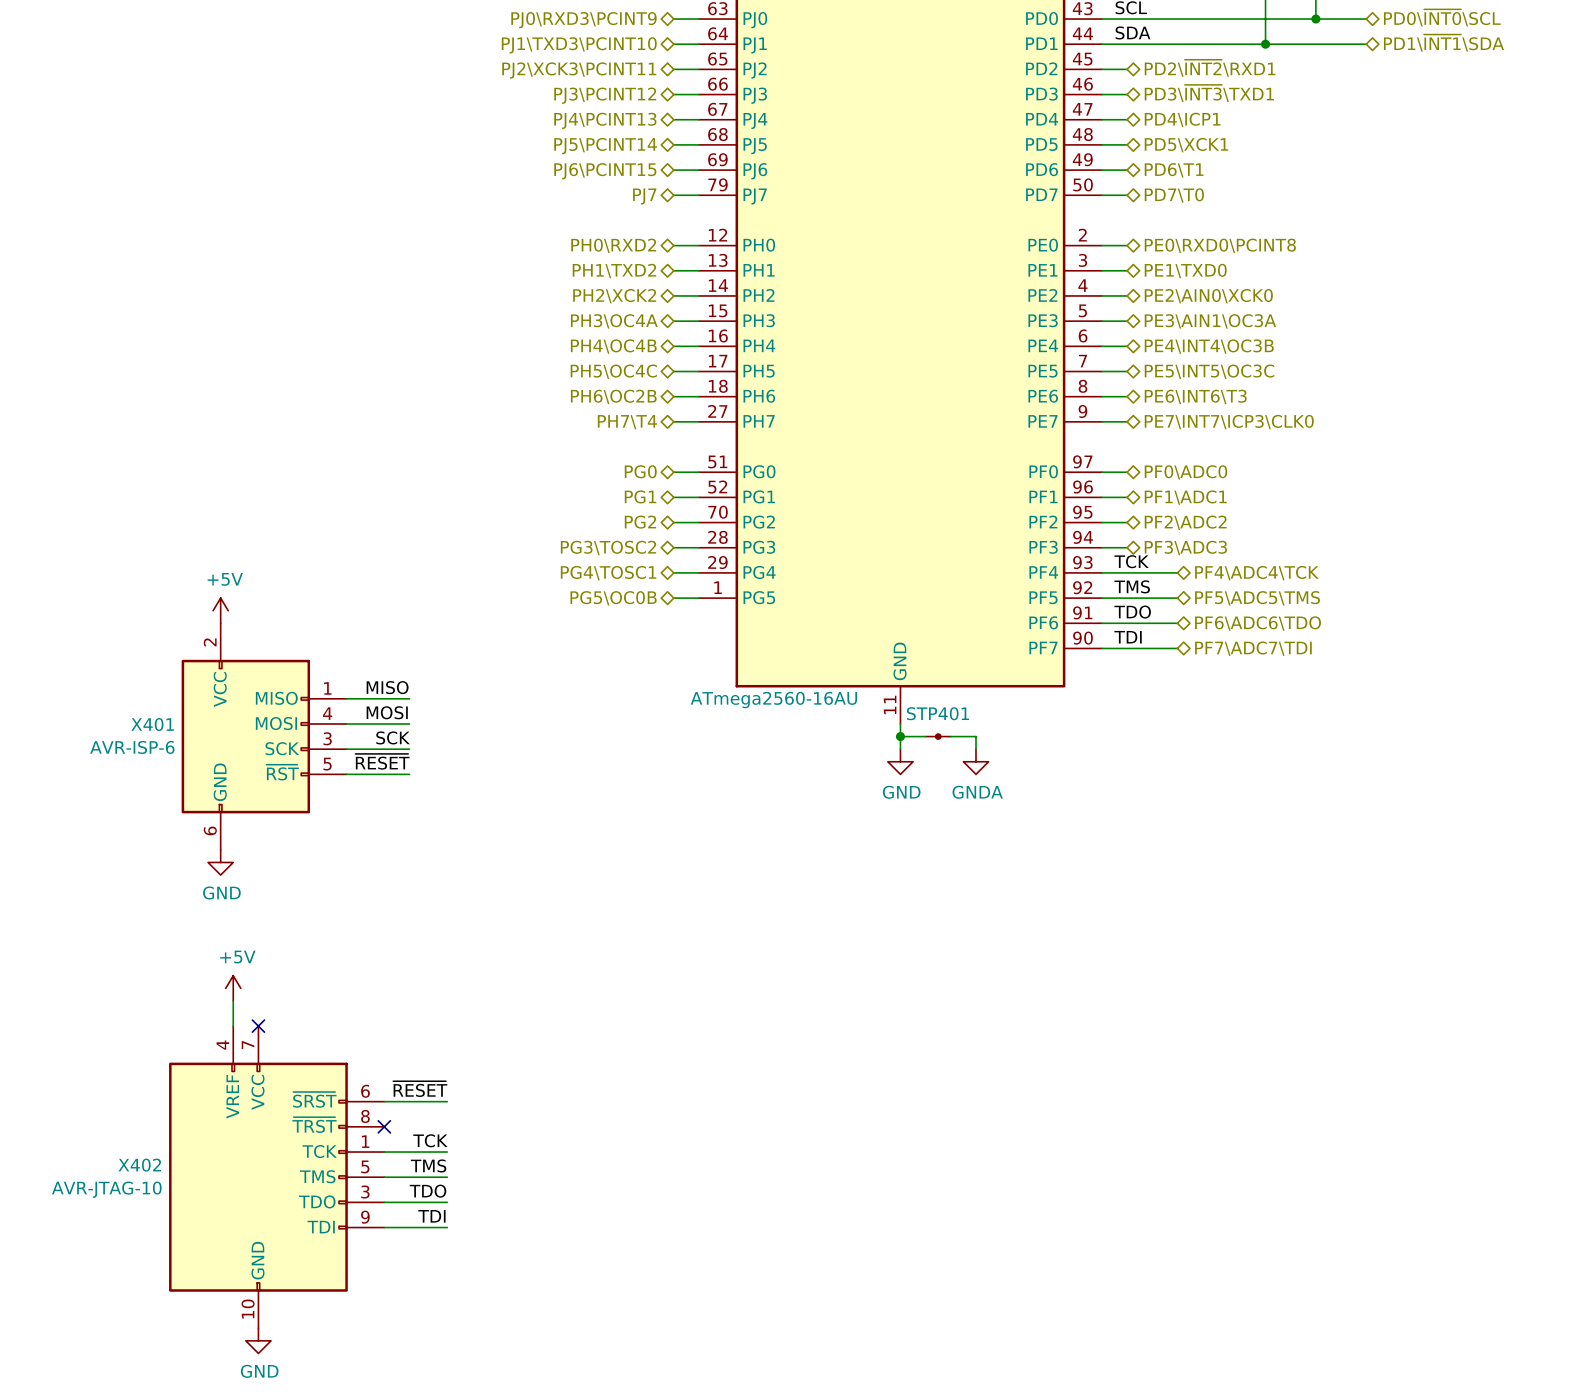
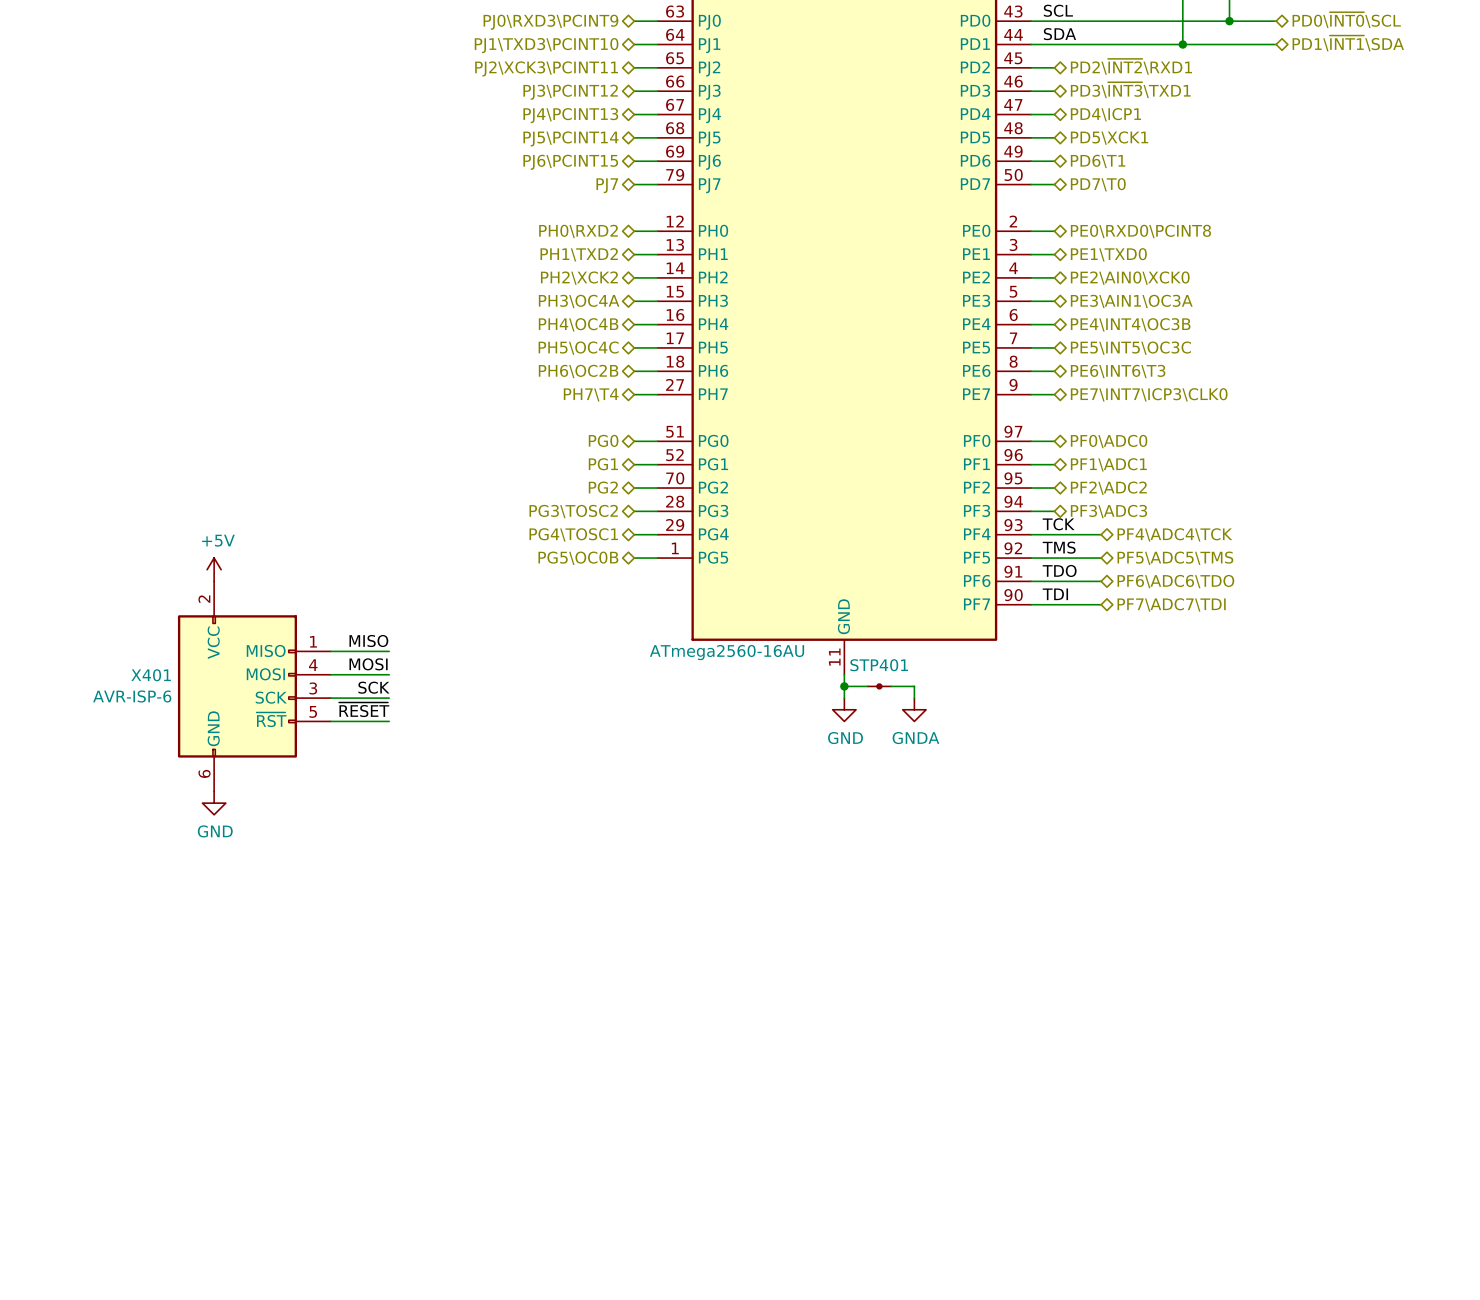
power symbol: +5V (233, 988) -> none
wire: (233, 1000) (233, 1026) -> none
no-connect mark: (258, 1026) -> none
label: ~{RESET} (420, 1089) -> none
wire: (384, 1101) (447, 1101) -> none
no-connect mark: (384, 1126) -> none
label: TCK (430, 1140) -> none
wire: (384, 1152) (447, 1152) -> none
label: TMS (428, 1165) -> none
X402: AVR-JTAG-10 (276, 1177) -> none
wire: (384, 1177) (447, 1177) -> none
label: TDO (428, 1191) -> none
wire: (384, 1202) (447, 1202) -> none
label: TDI (431, 1216) -> none
wire: (384, 1227) (447, 1227) -> none
power symbol: GND (258, 1340) -> none

